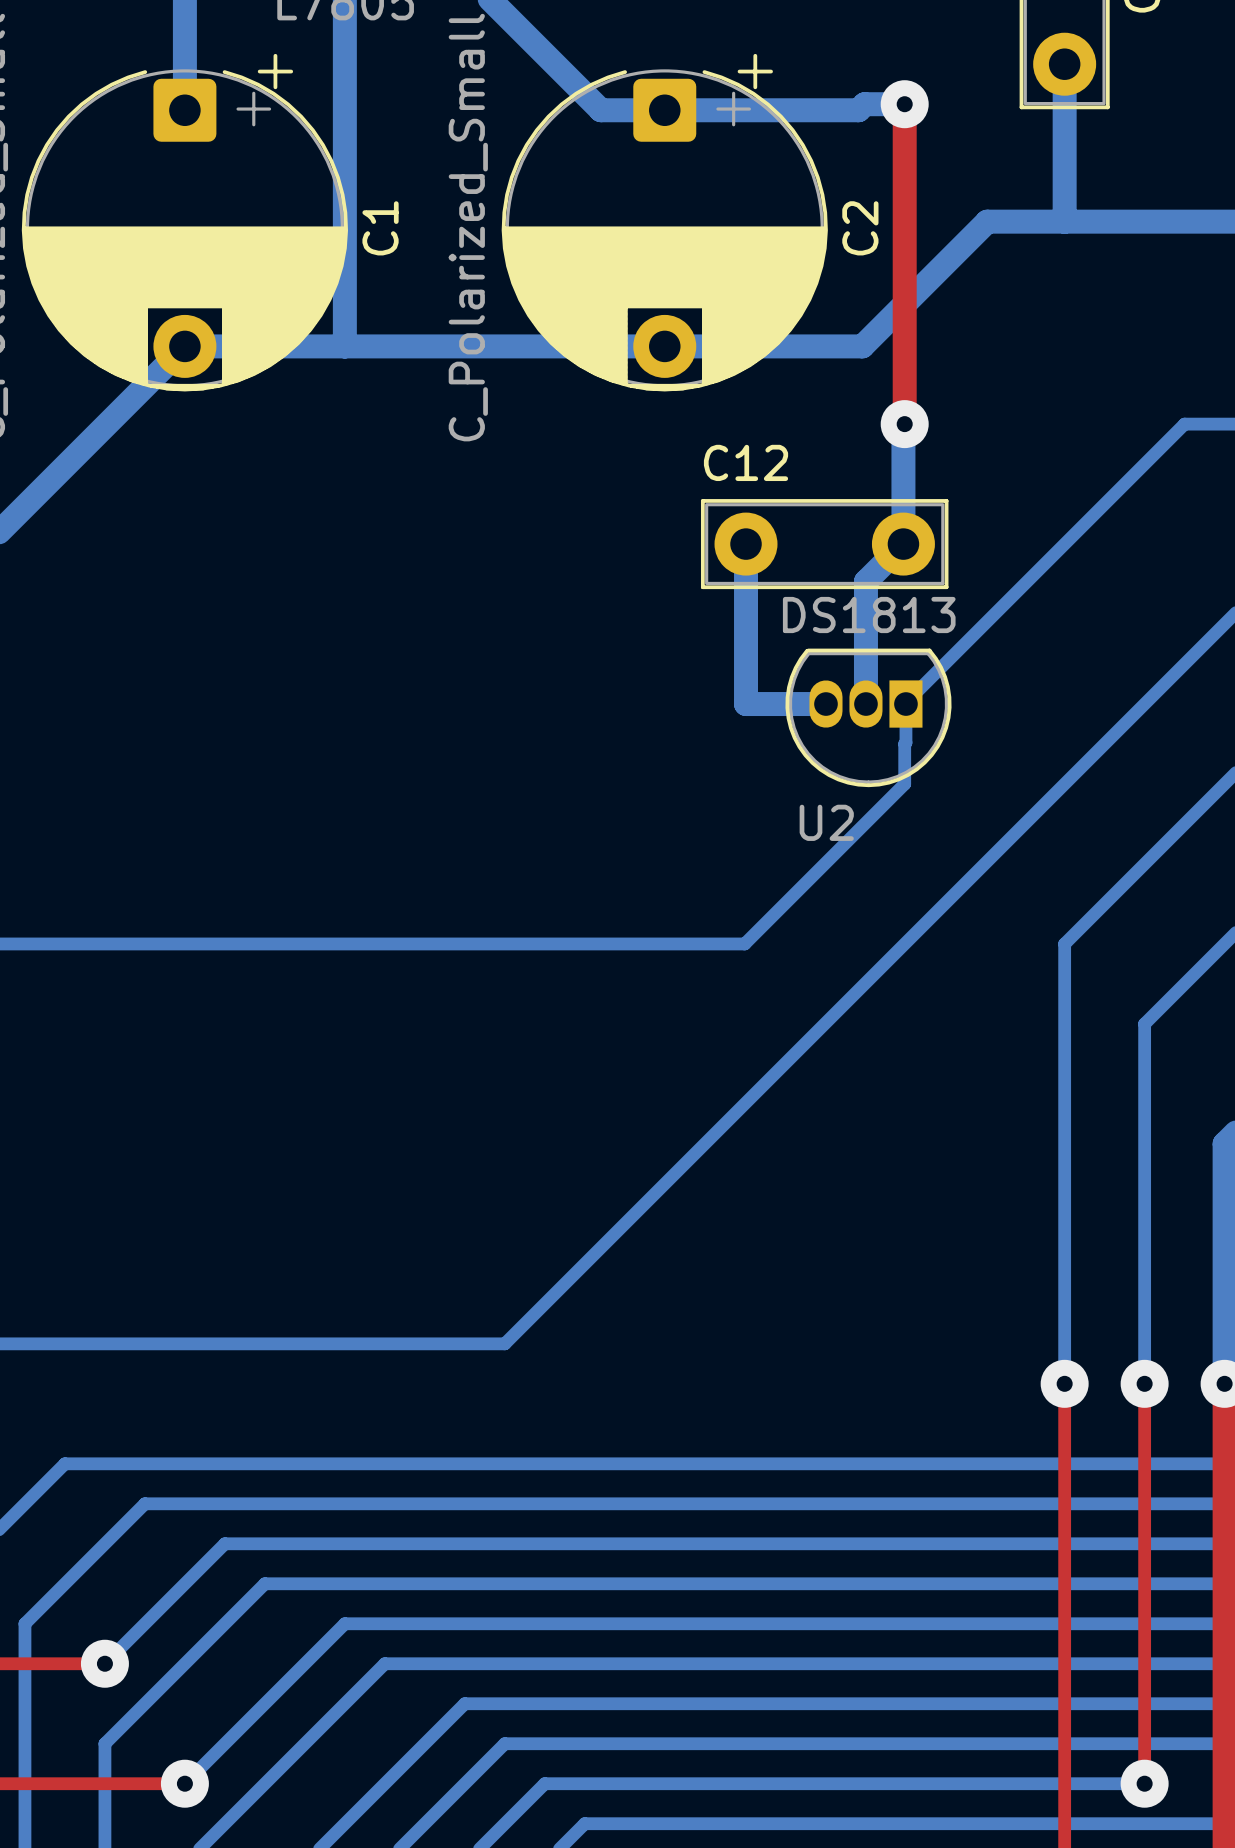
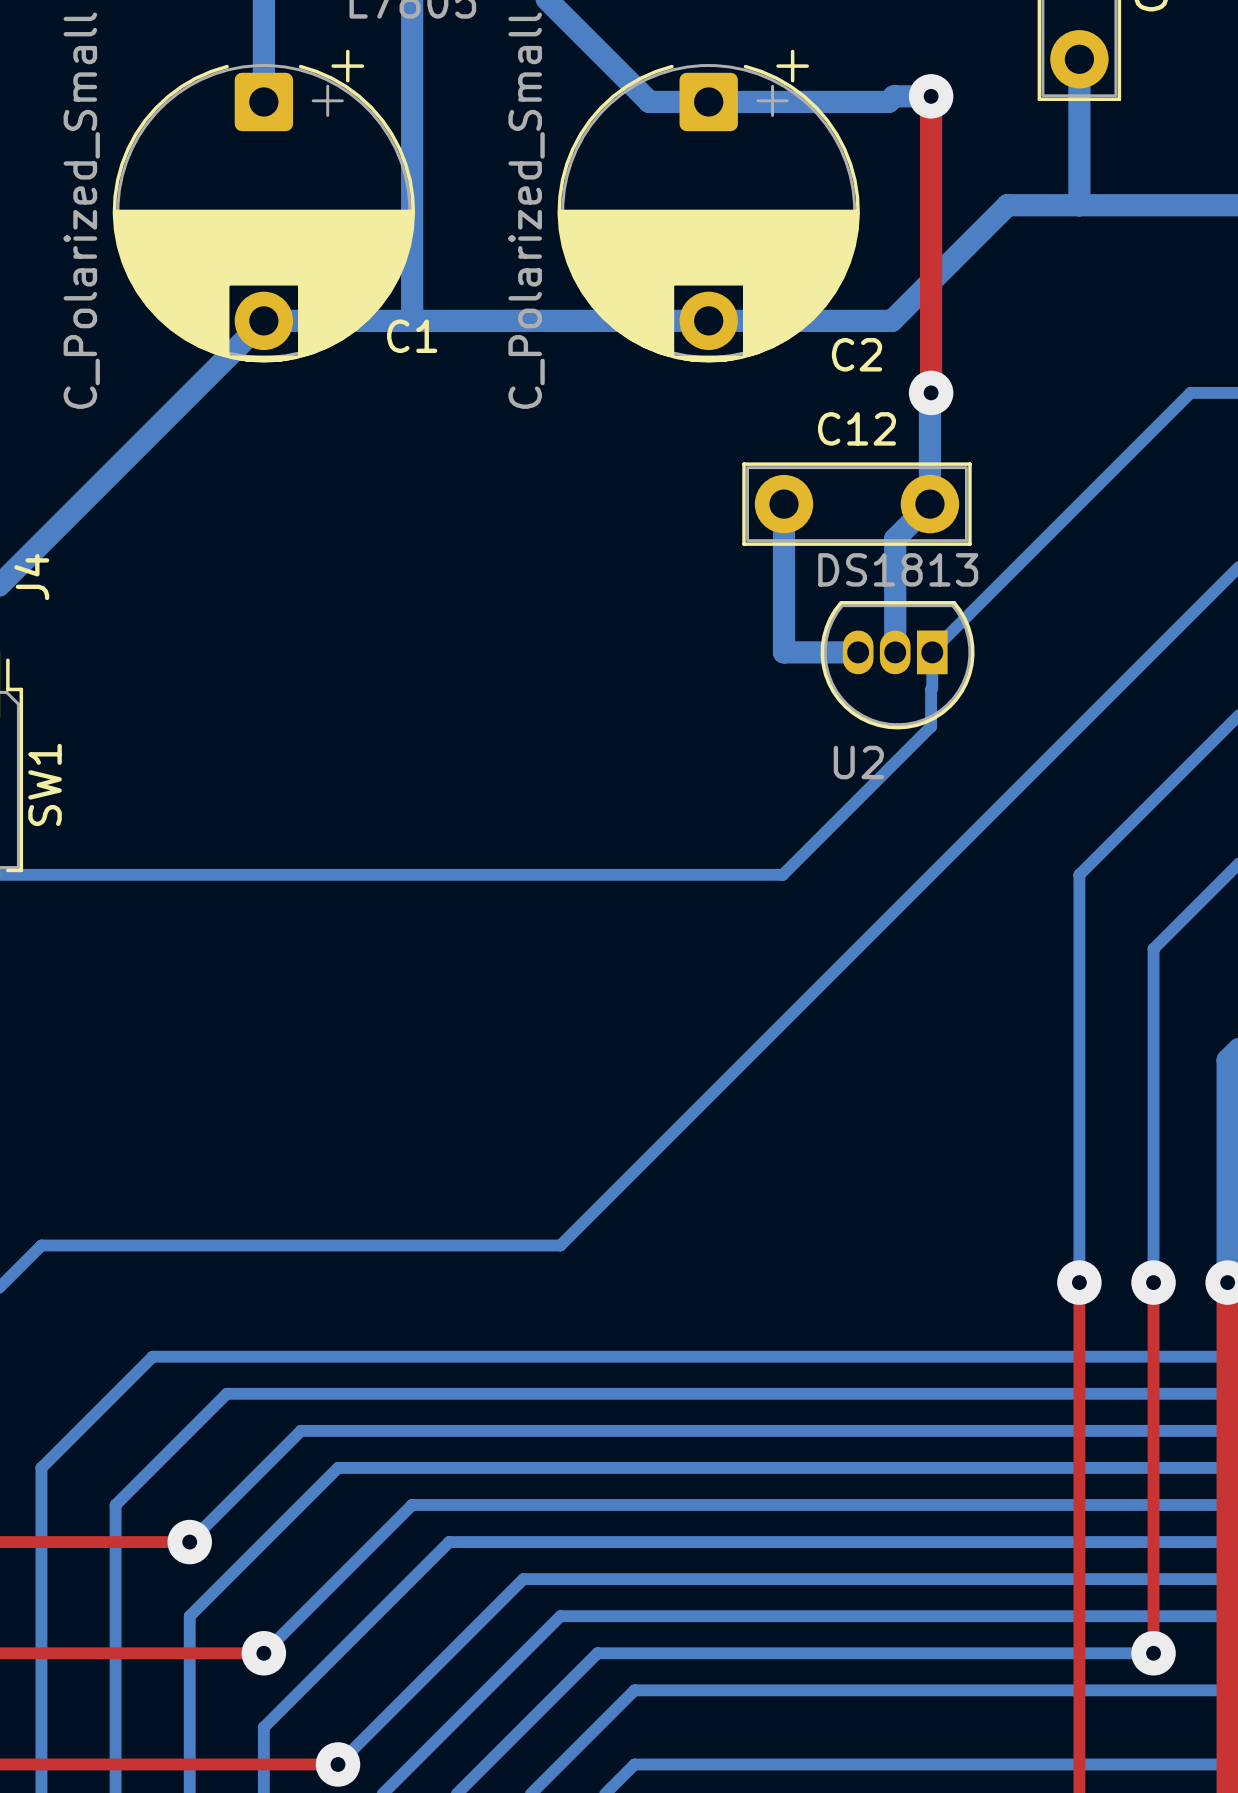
C1 name rotation: 0° (380, 228) -> 90° clockwise (412, 336)
C1 name position: C1 (380, 228) -> C1 (412, 336)
C2 name rotation: 0° (860, 228) -> 90° clockwise (856, 354)
C2 name position: C2 (860, 228) -> C2 (856, 354)
C12 name position: C12 (746, 462) -> C12 (856, 428)

